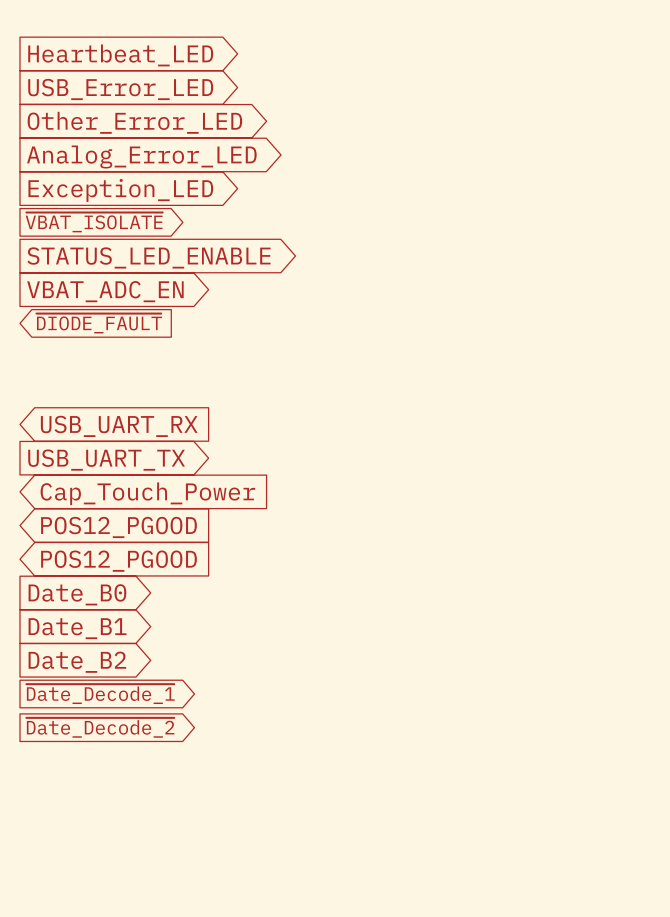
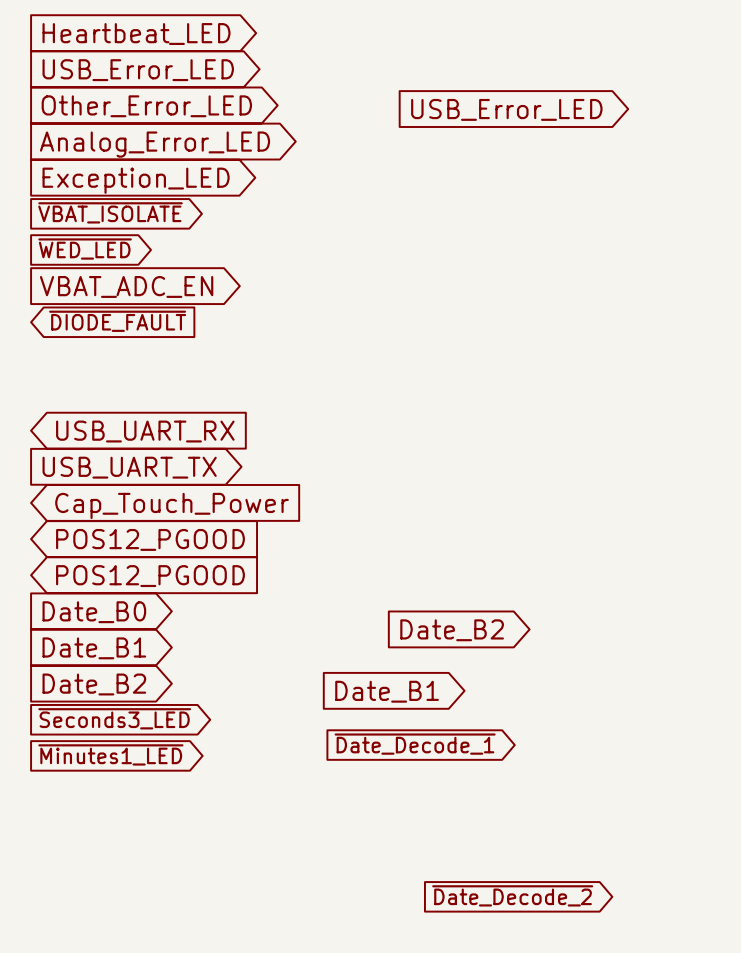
global label: none -> USB_Error_LED (506, 109)
global label: STATUS_LED_ENABLE (148, 257) -> ~{WED_LED} (85, 249)
global label: none -> Date_B2 (452, 630)
global label: none -> Date_B1 (387, 691)
global label: ~{Date_Decode_1} (100, 694) -> ~{Seconds3_LED} (114, 718)
global label: none -> ~{Date_Decode_1} (415, 744)
global label: ~{Date_Decode_2} (100, 727) -> ~{Minutes1_LED} (110, 754)
global label: none -> ~{Date_Decode_2} (512, 895)

